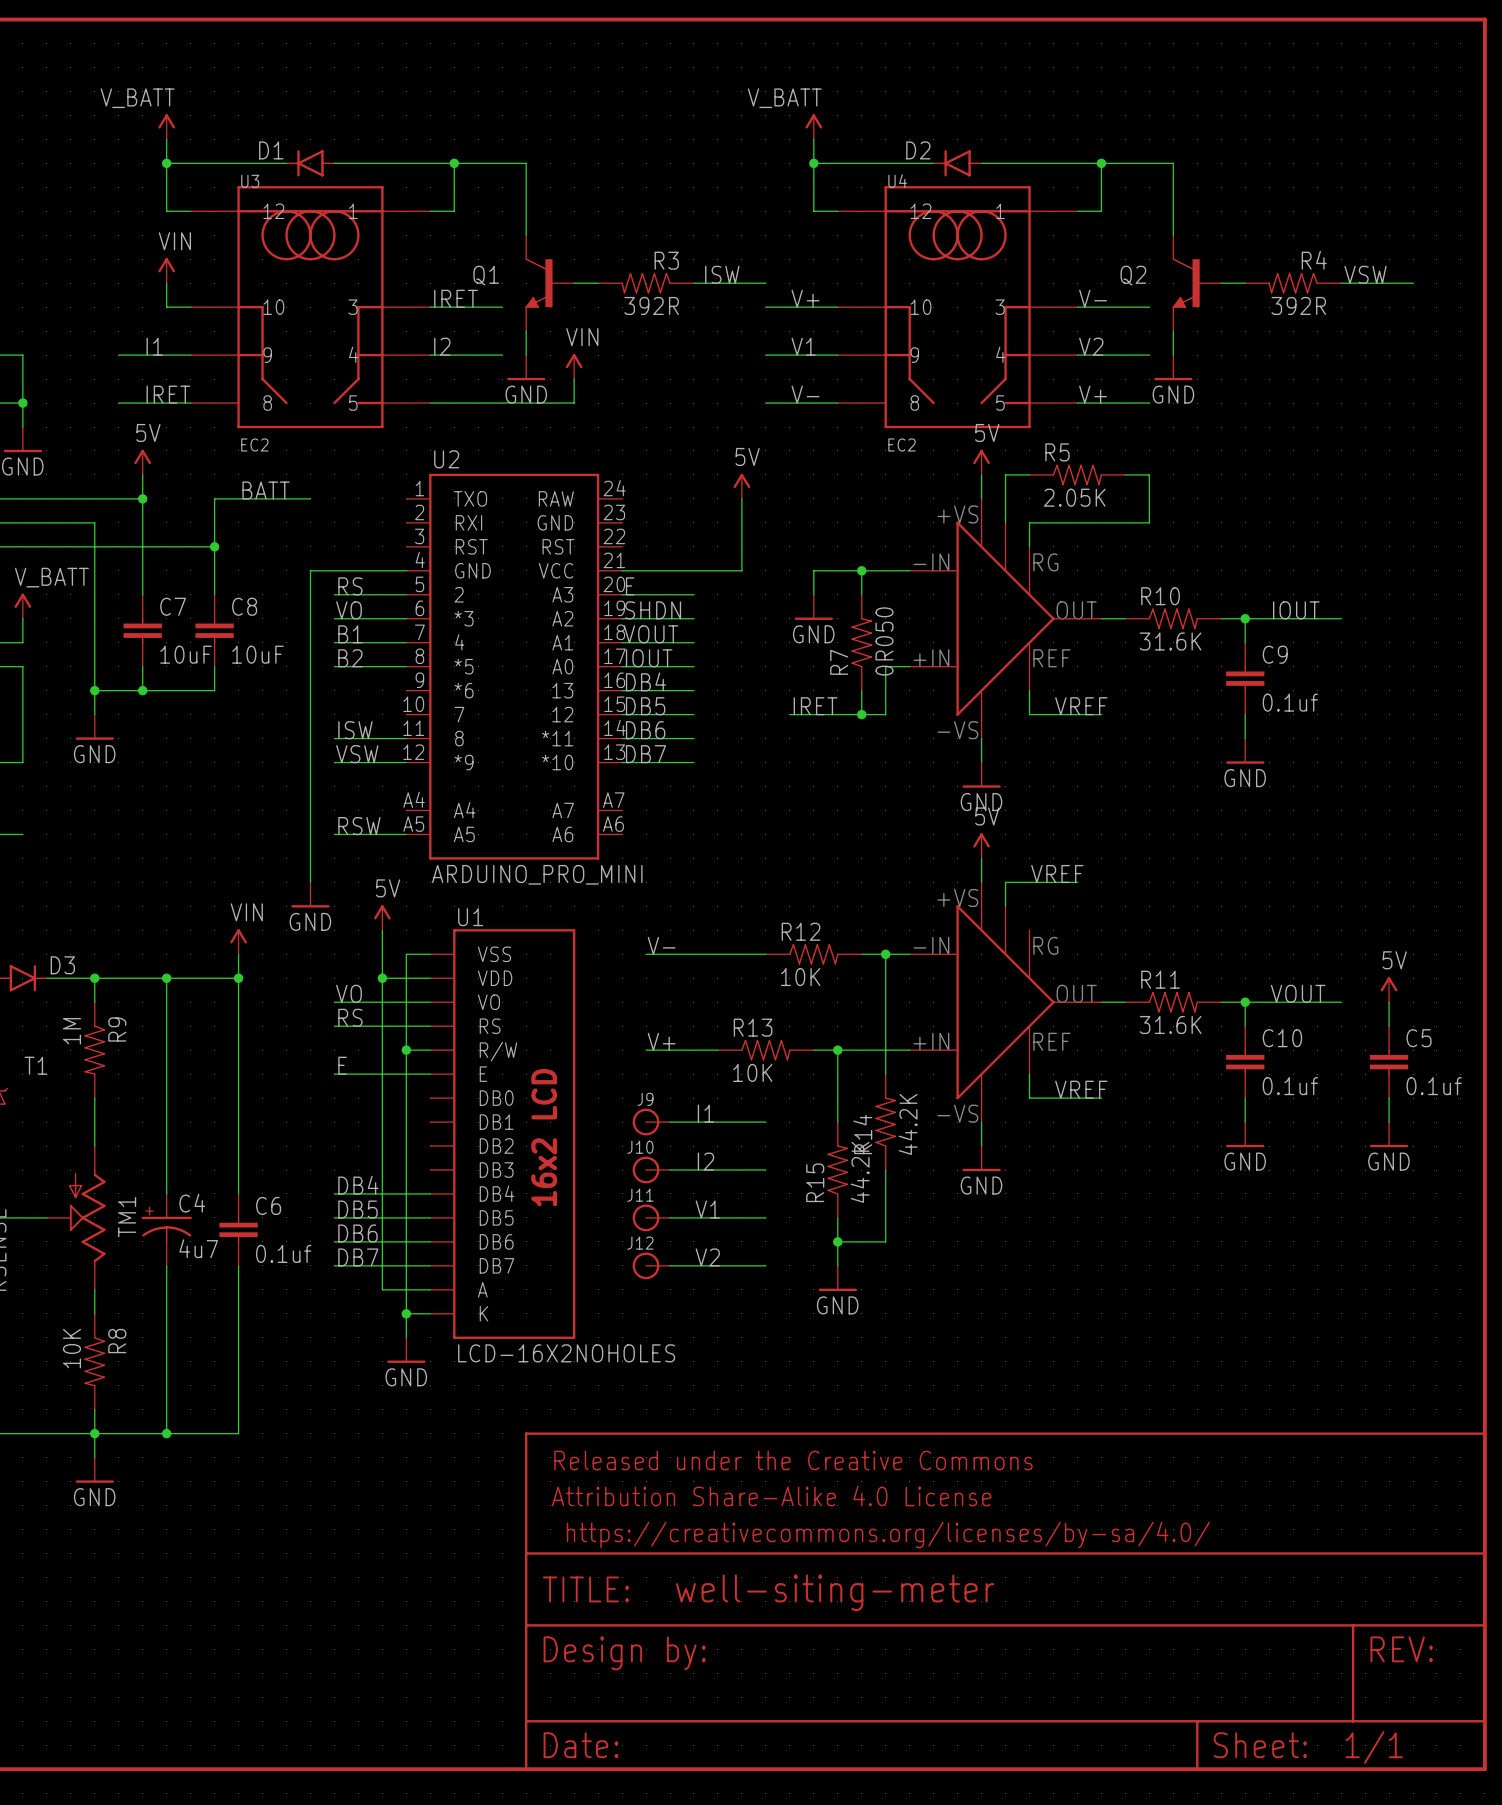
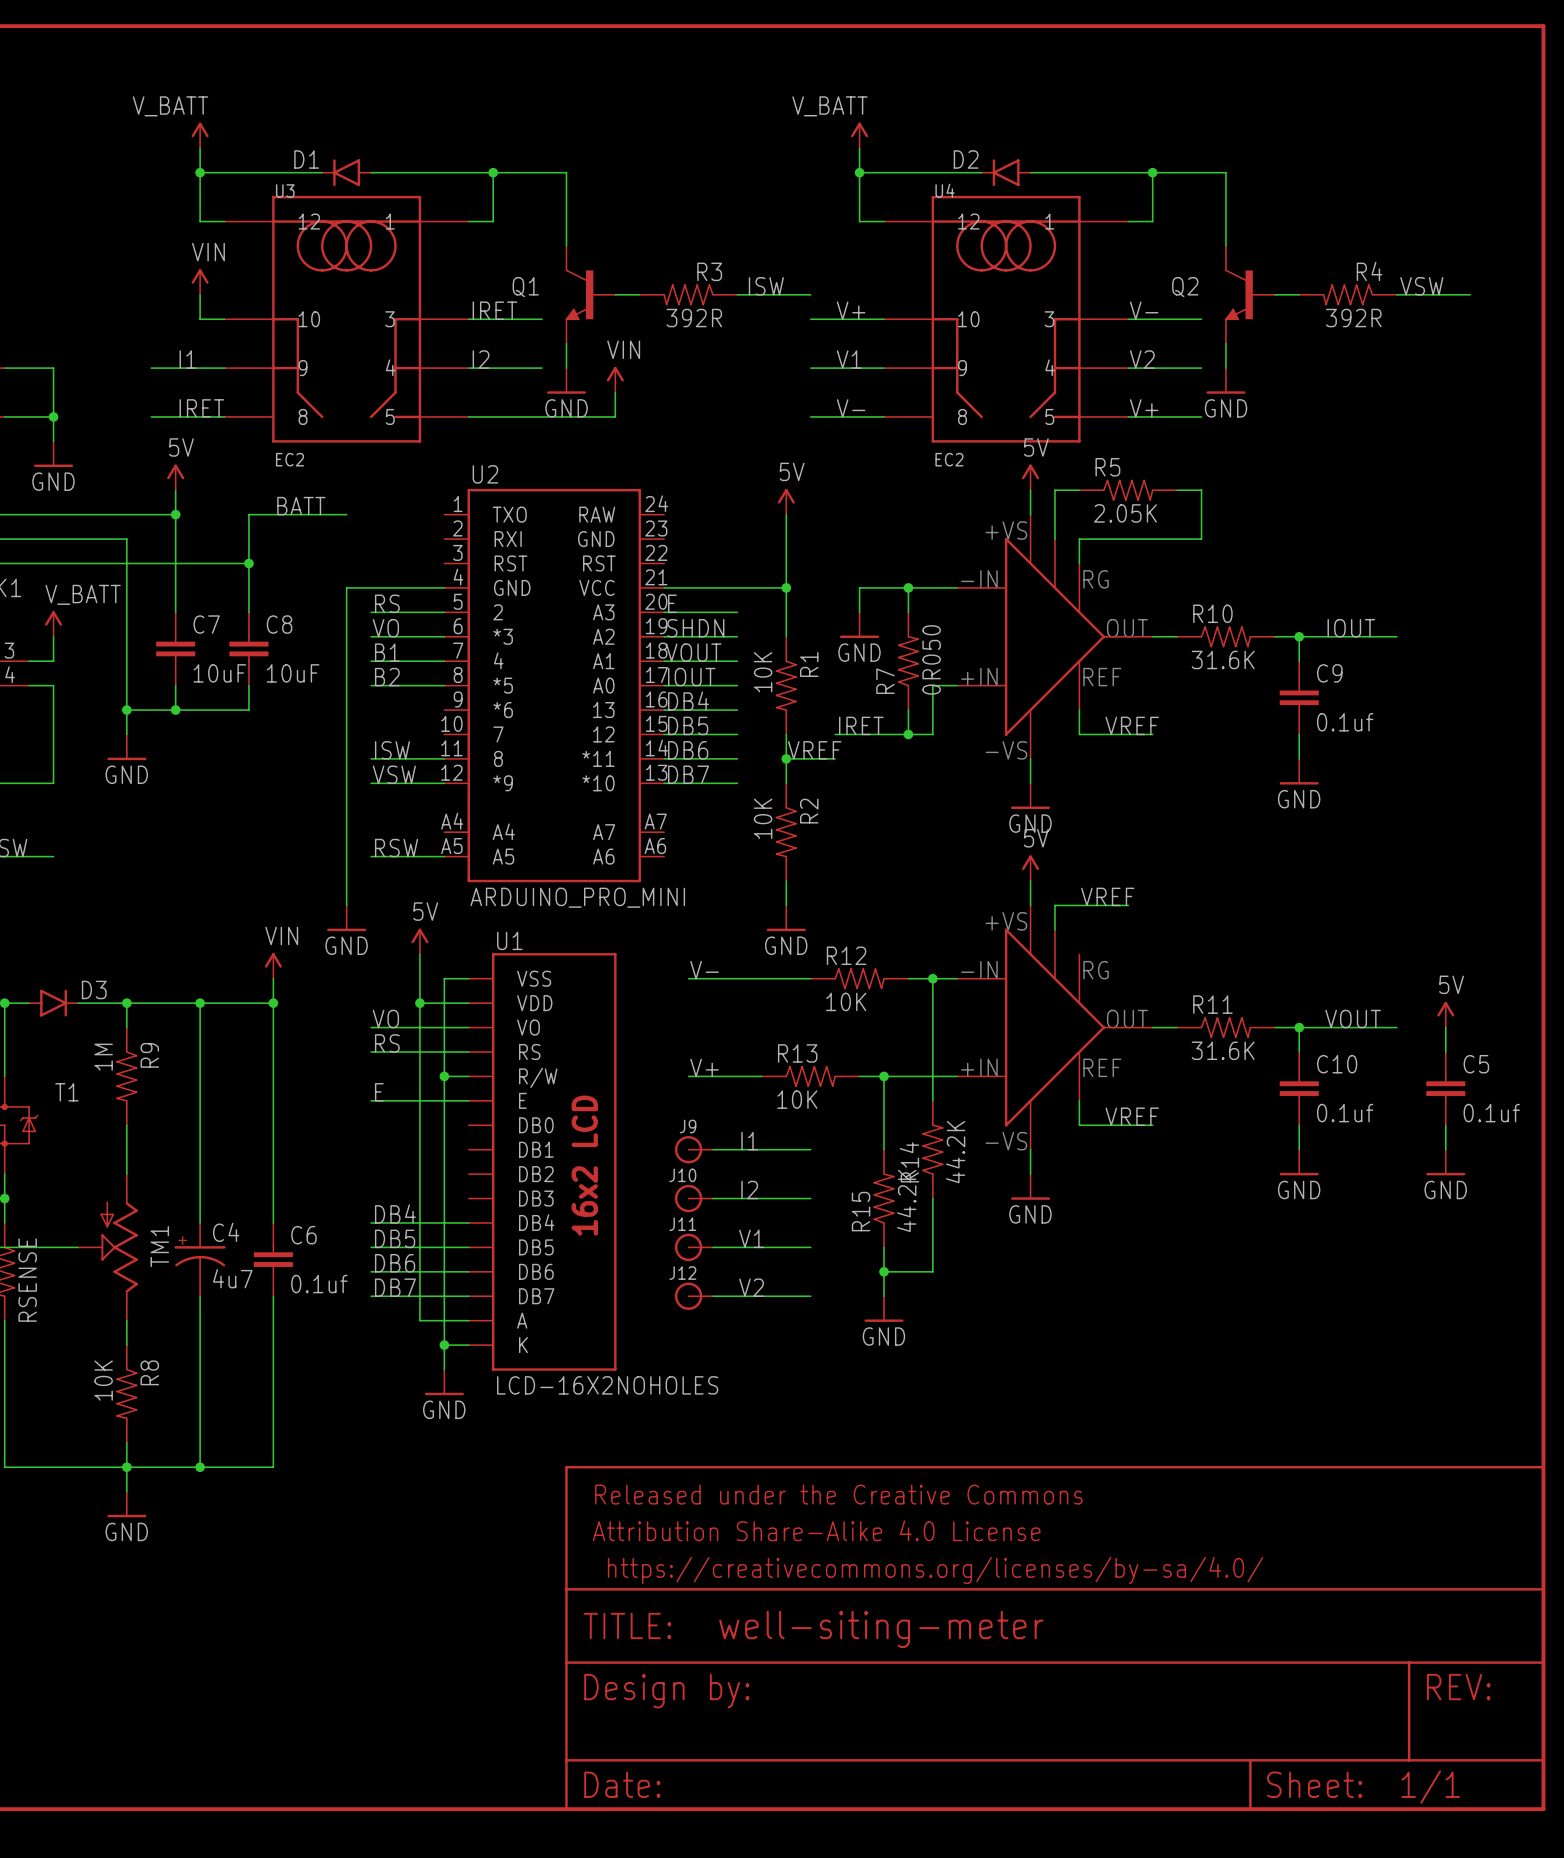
wire: none -> (786, 587) (786, 636)
junction: none -> (786, 587)
R1: none -> 10K (786, 685)
wire: none -> (786, 734) (786, 783)
label: none -> VREF (814, 750)
wire: none -> (786, 758) (835, 758)
junction: none -> (786, 758)
R2: none -> 10K (786, 832)
wire: none -> (786, 881) (786, 905)
power symbol: none -> GND (786, 918)

